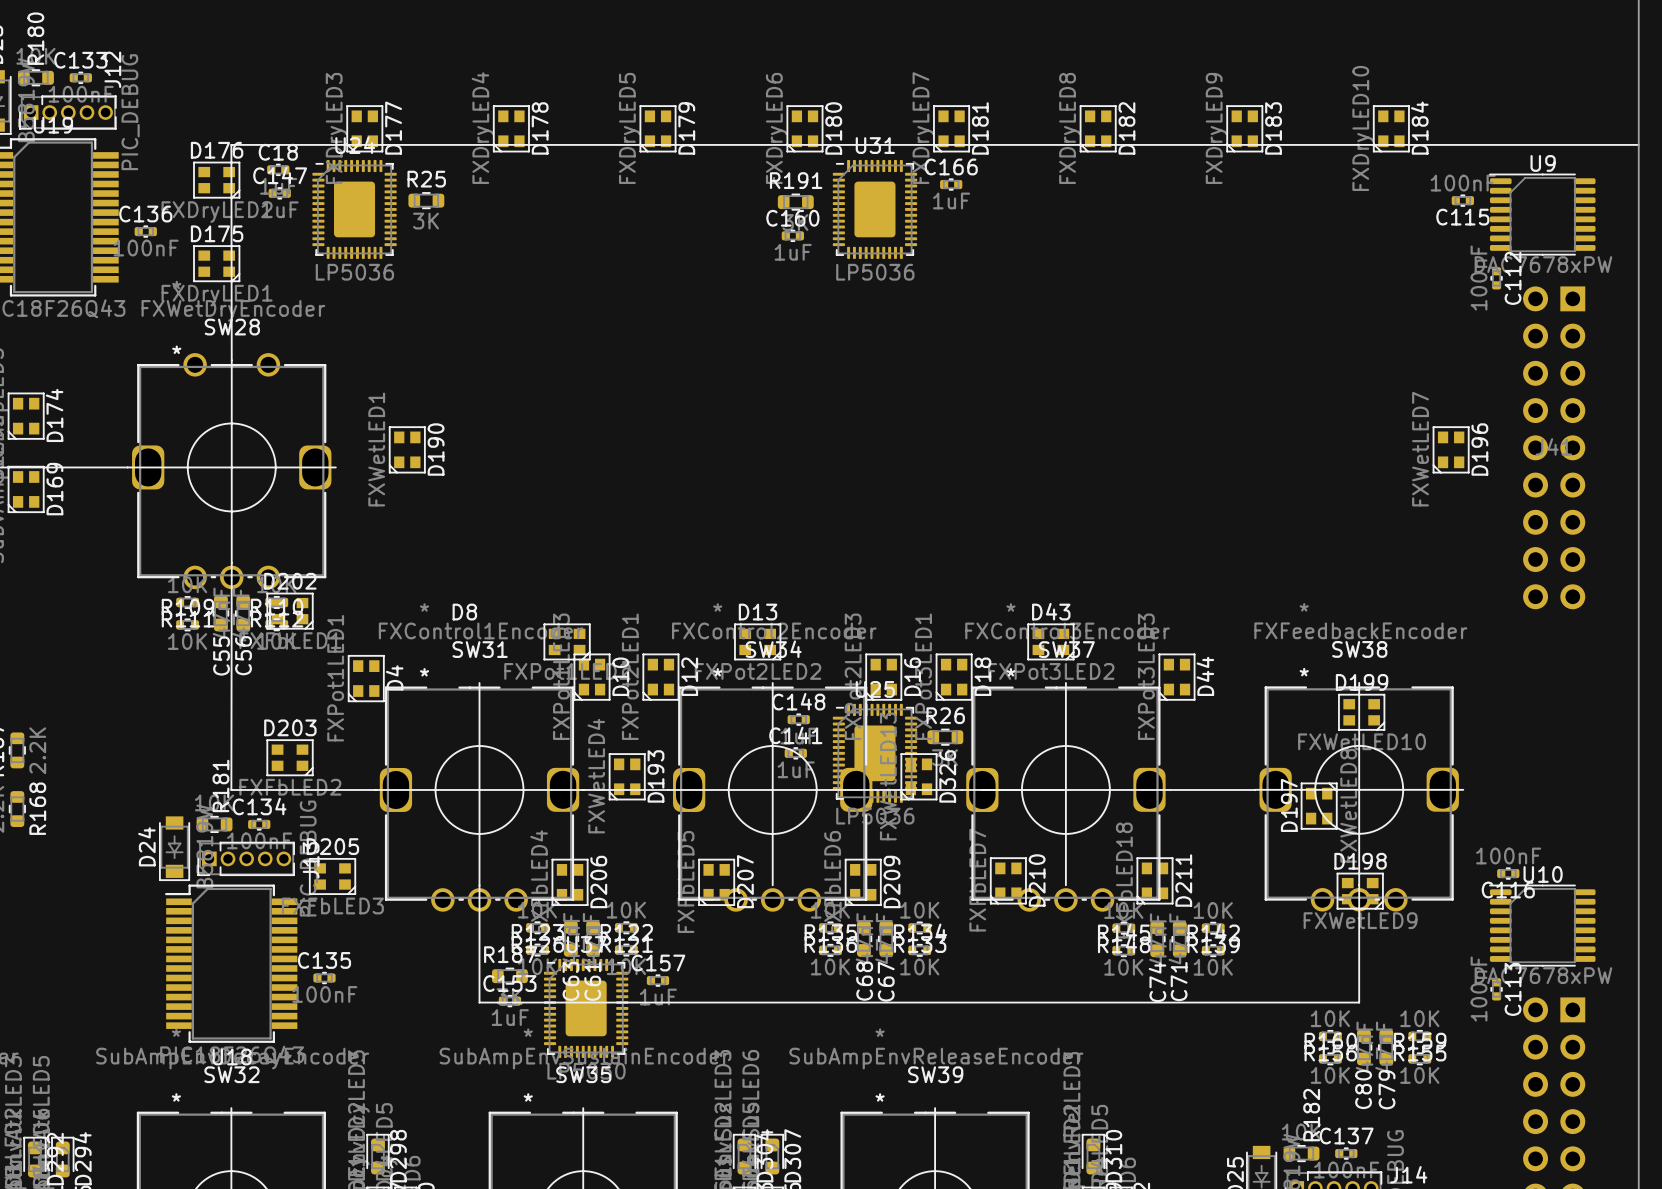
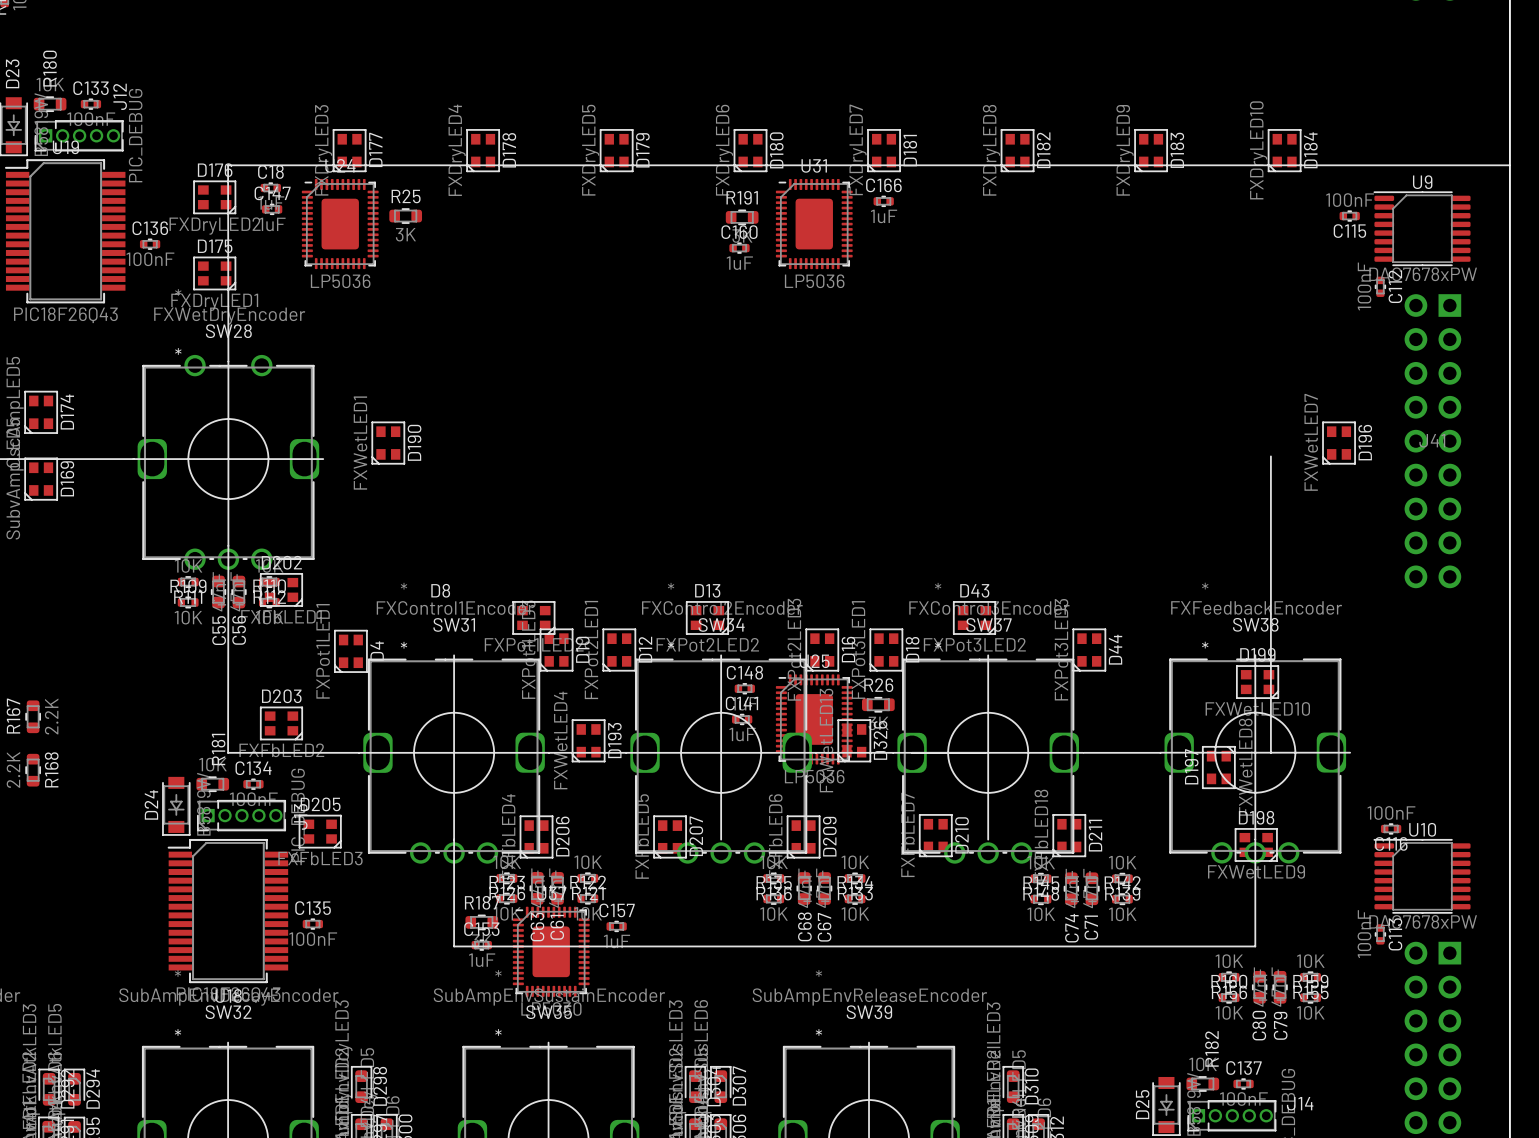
line: none -> (1270, 456) (1270, 752)

